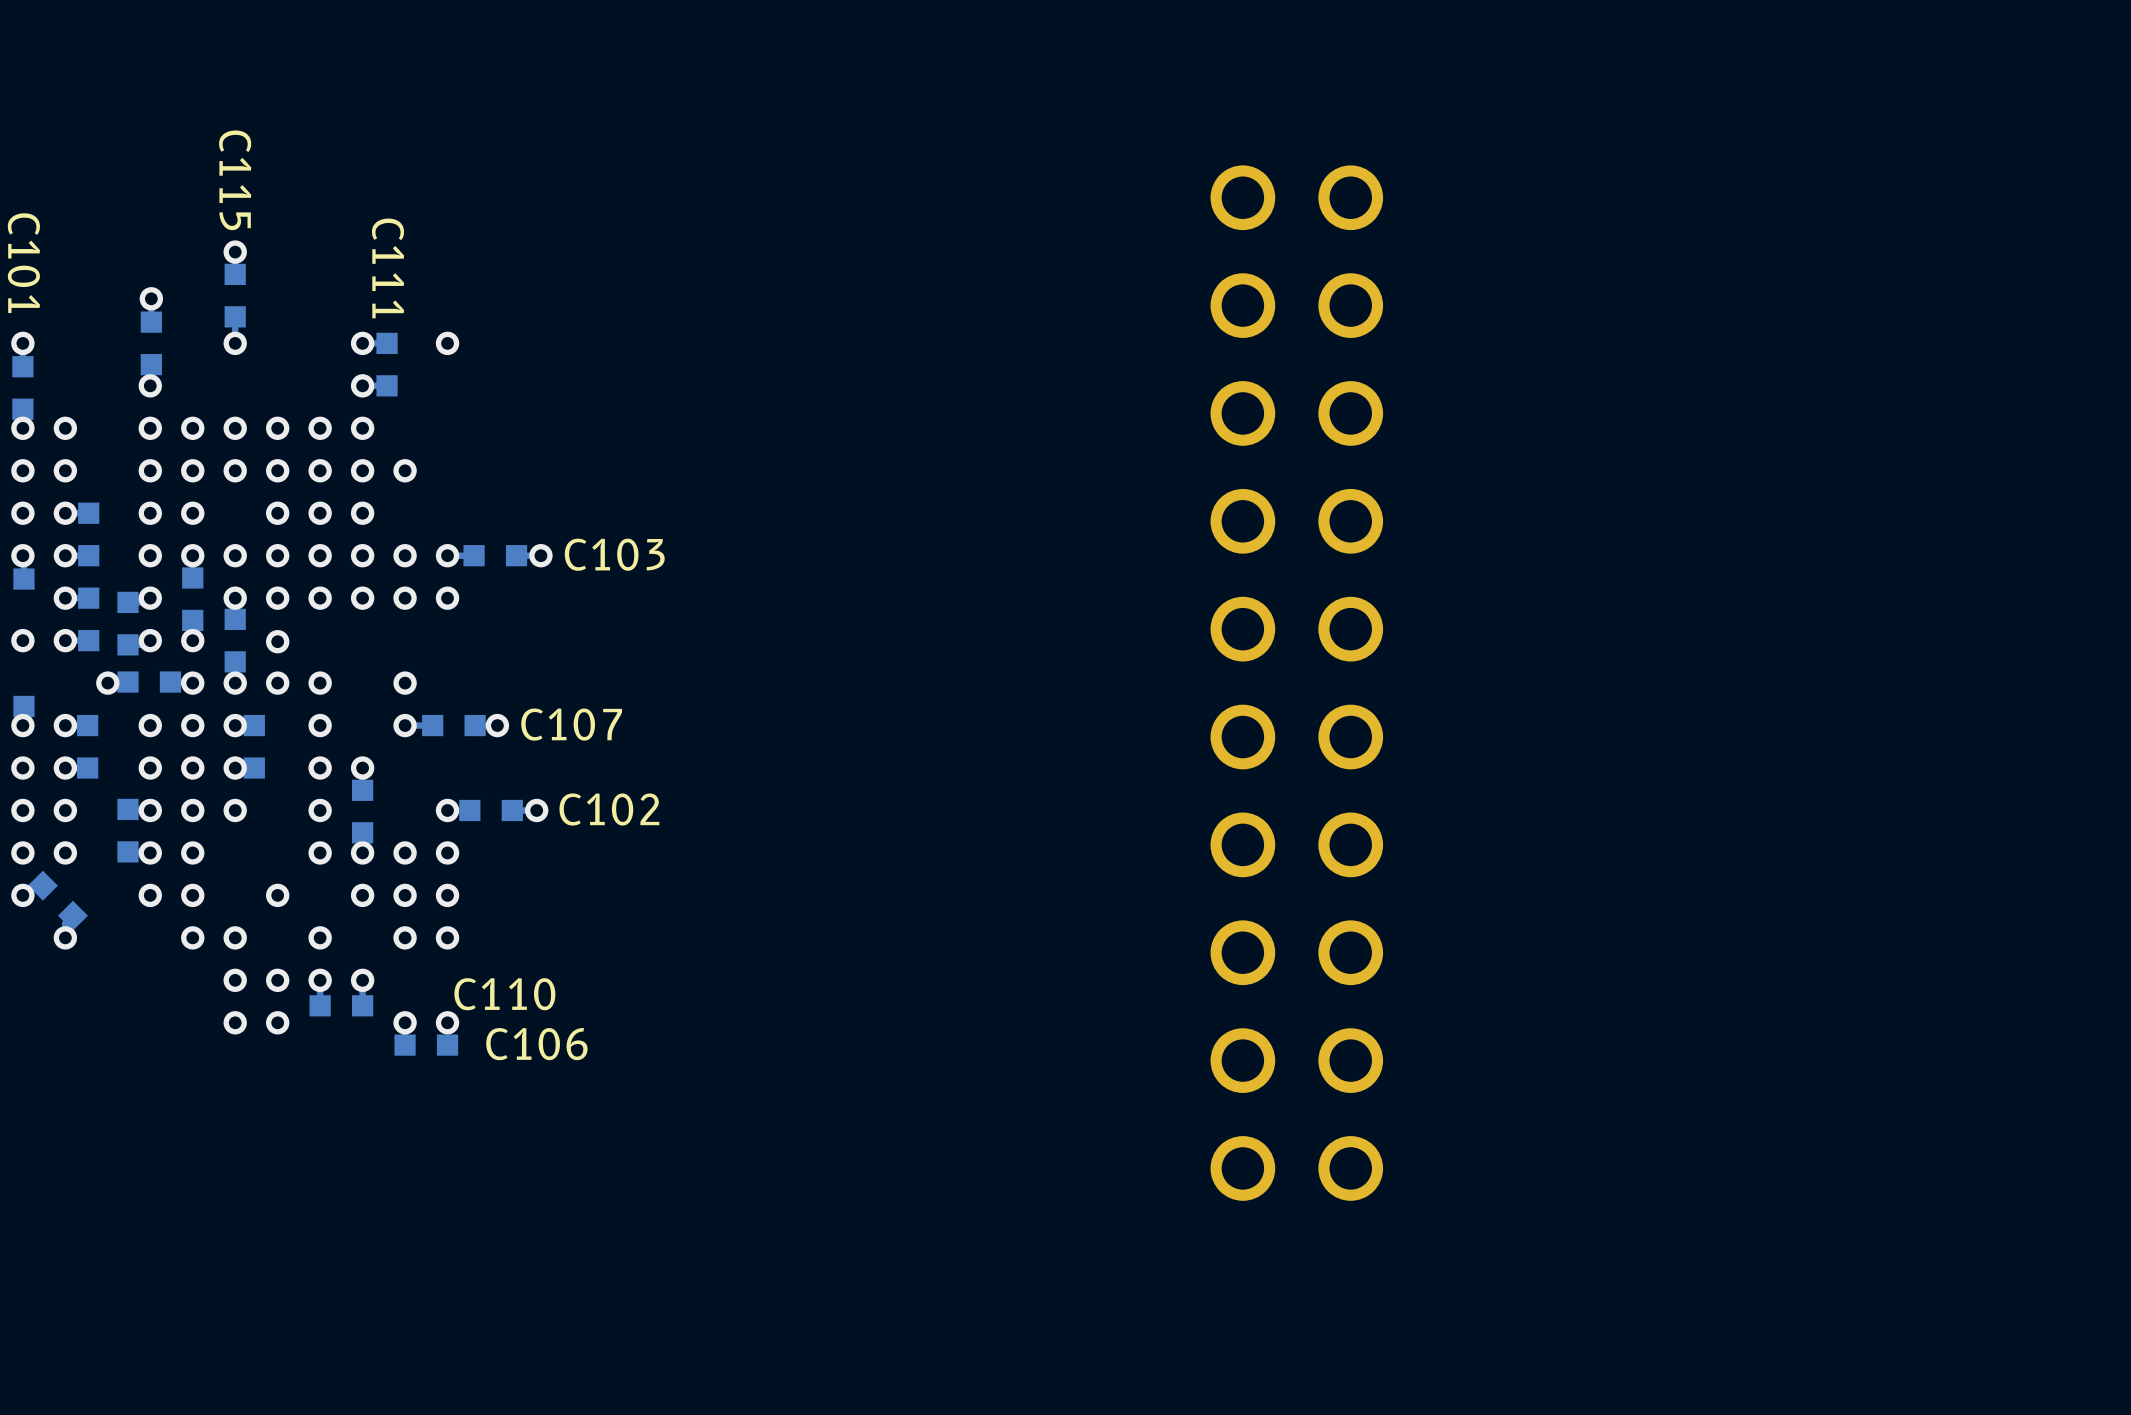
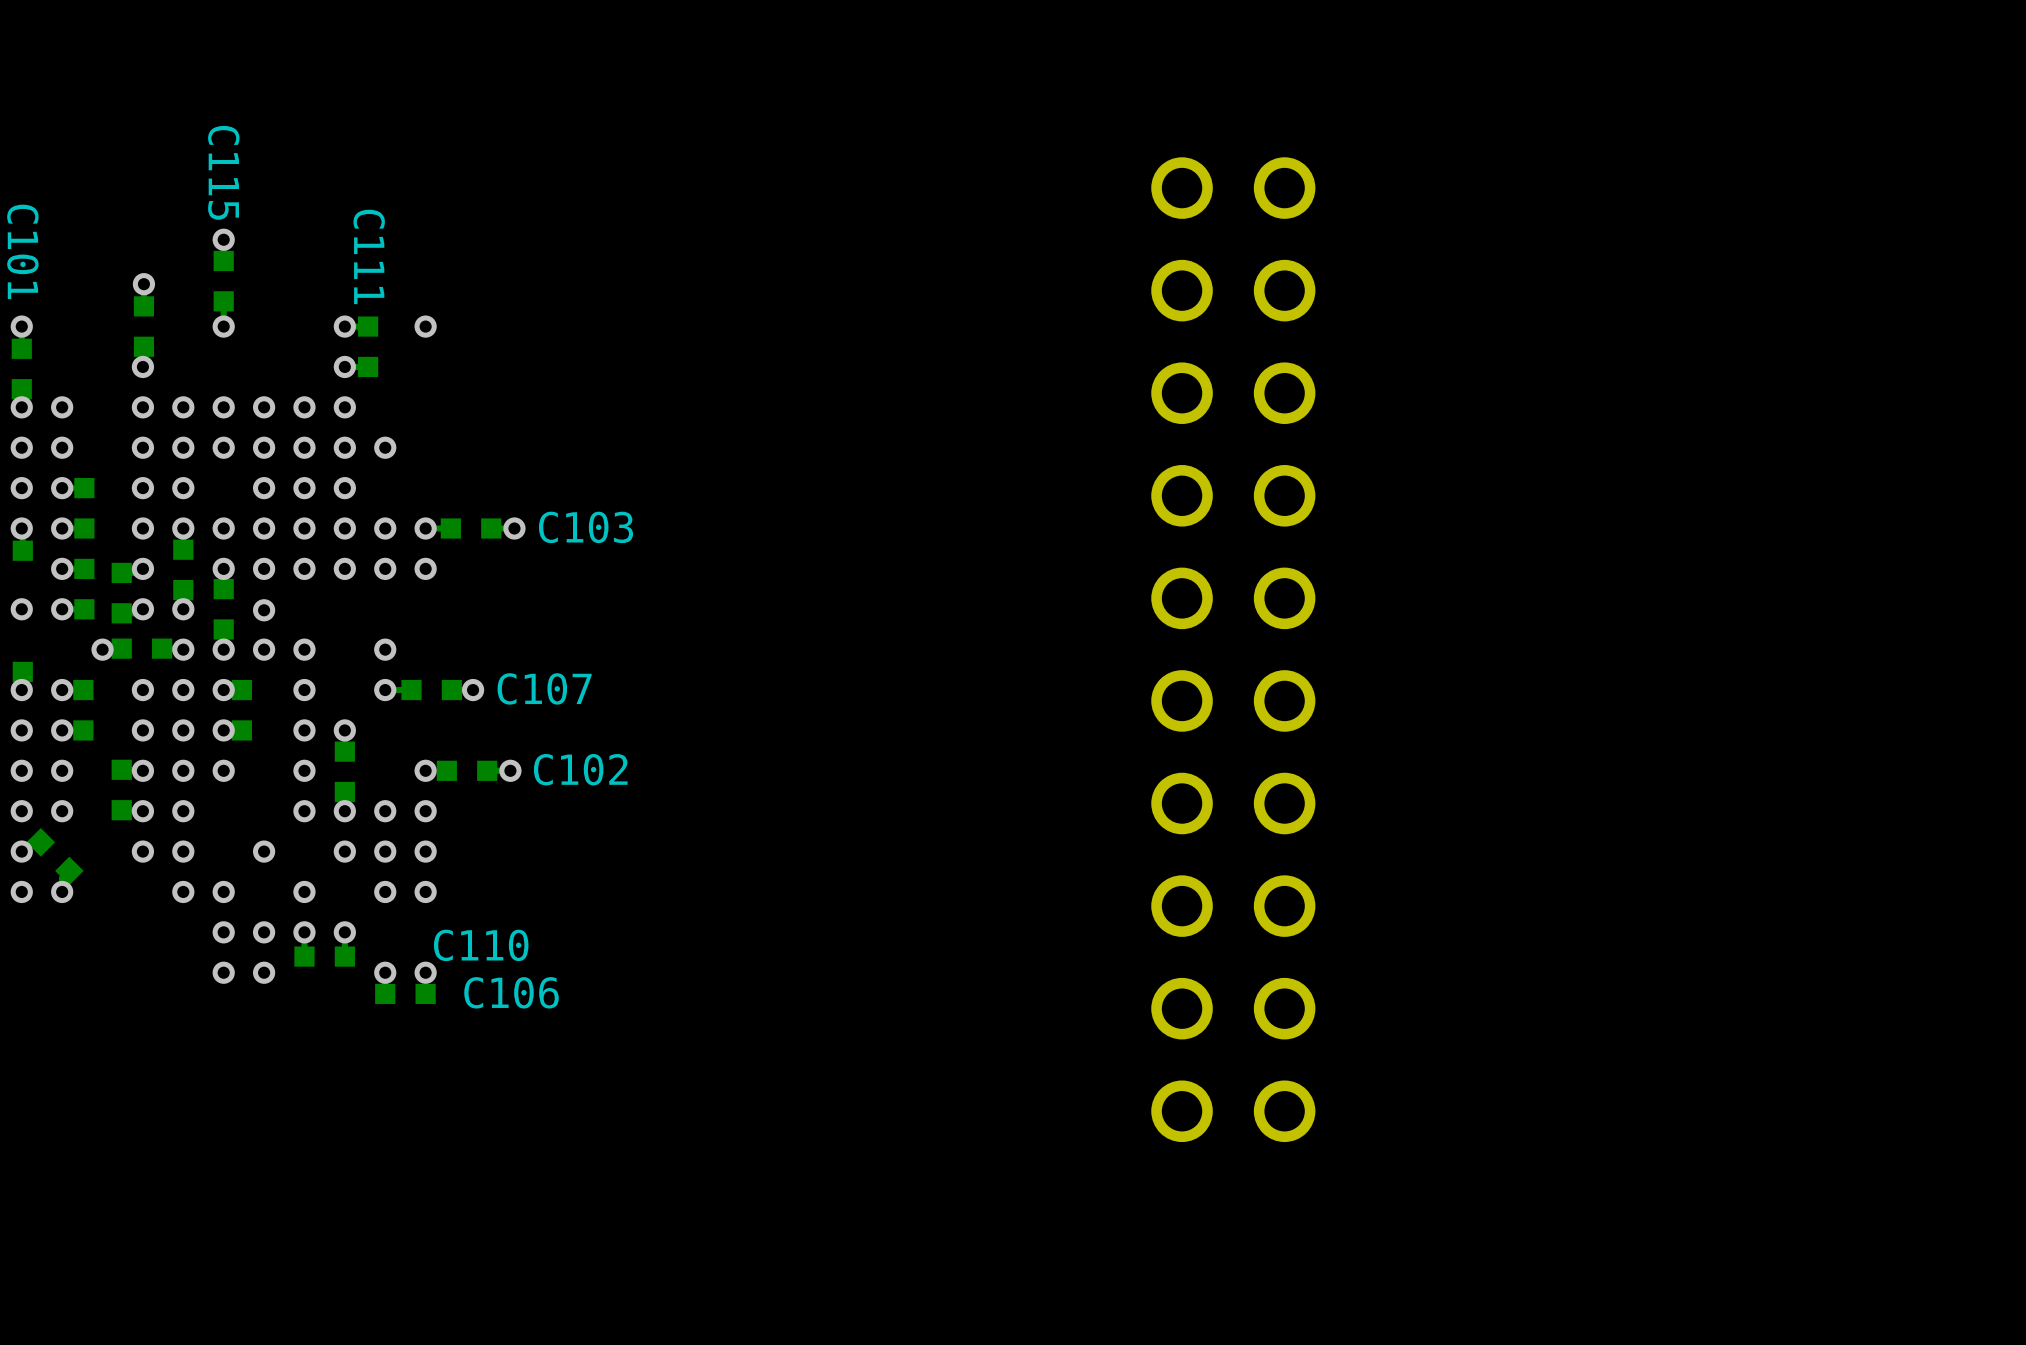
via: none -> (21, 891)

